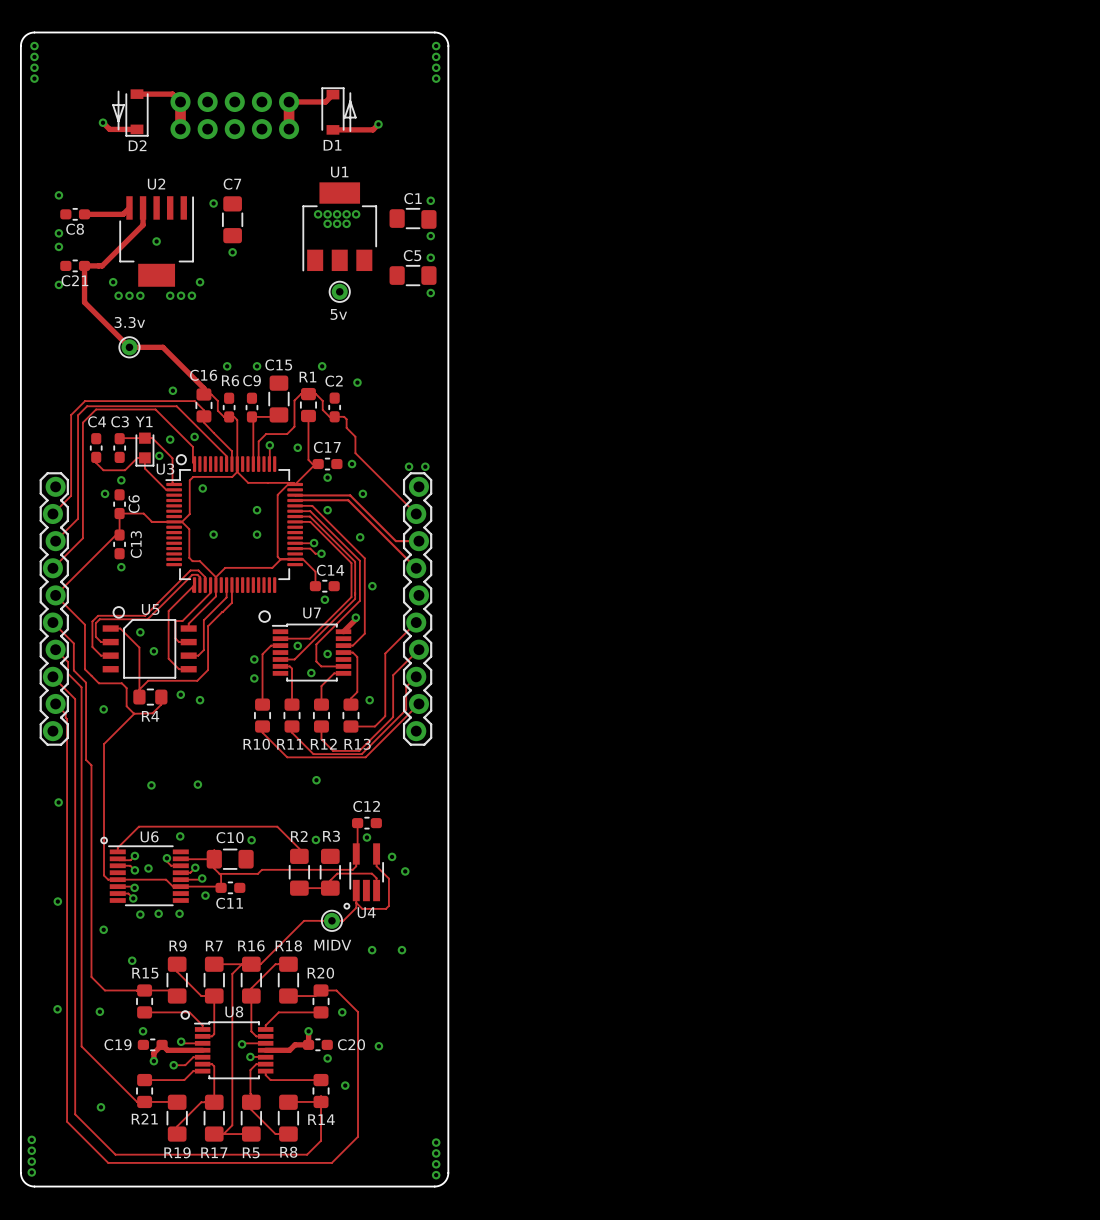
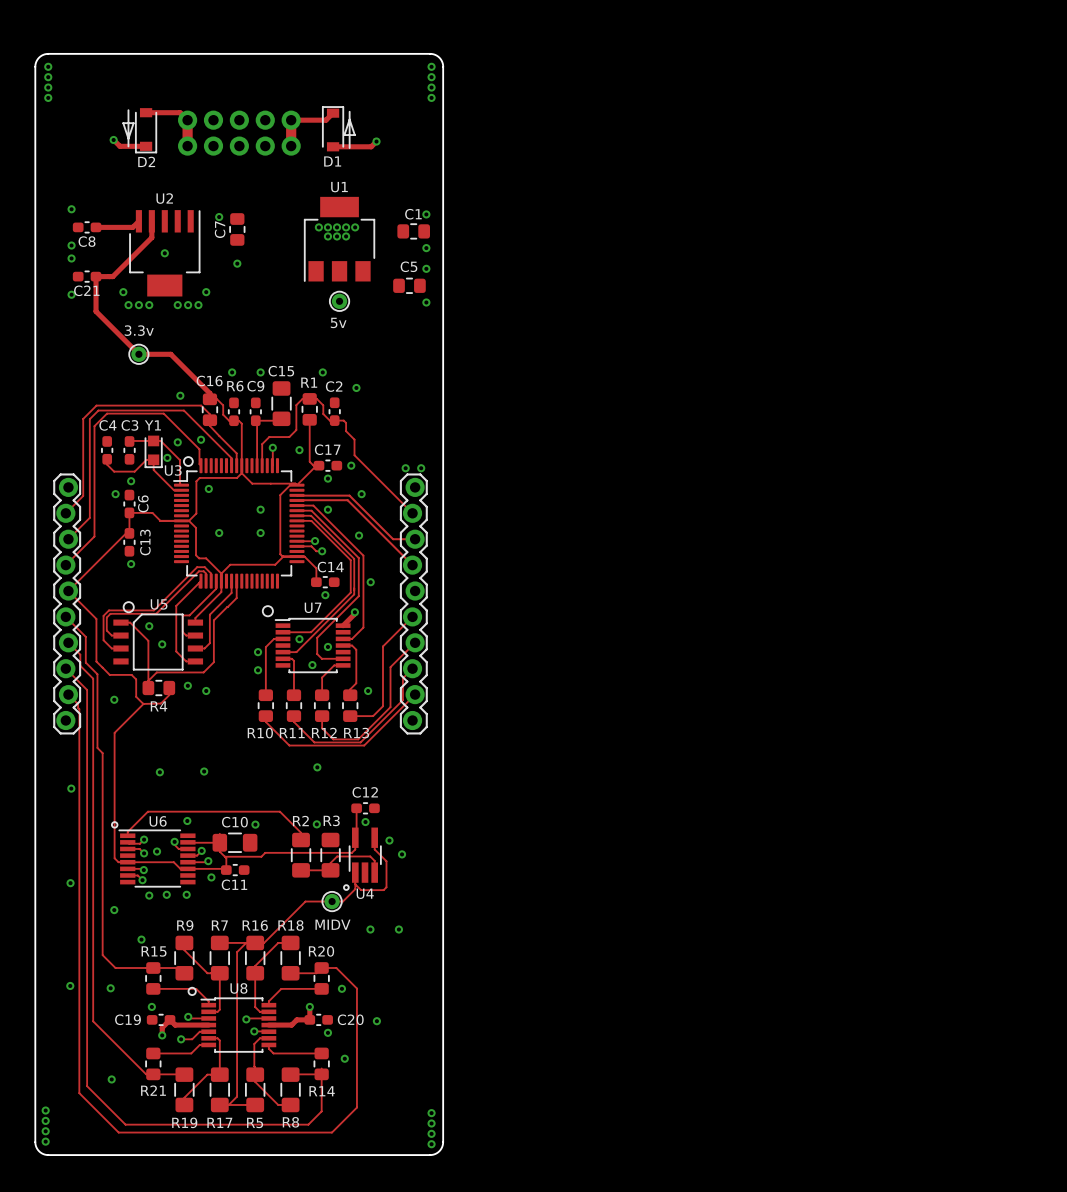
C7 name rotation: 0° (232, 184) -> 90° counterclockwise (220, 229)
C7 name position: C7 (232, 184) -> C7 (220, 229)
C7 footprint: [222, 196, 243, 244] -> [229, 213, 246, 246]
C1 footprint: [389, 208, 437, 229] -> [397, 223, 431, 240]
C5 footprint: [389, 265, 437, 286] -> [393, 277, 426, 294]

